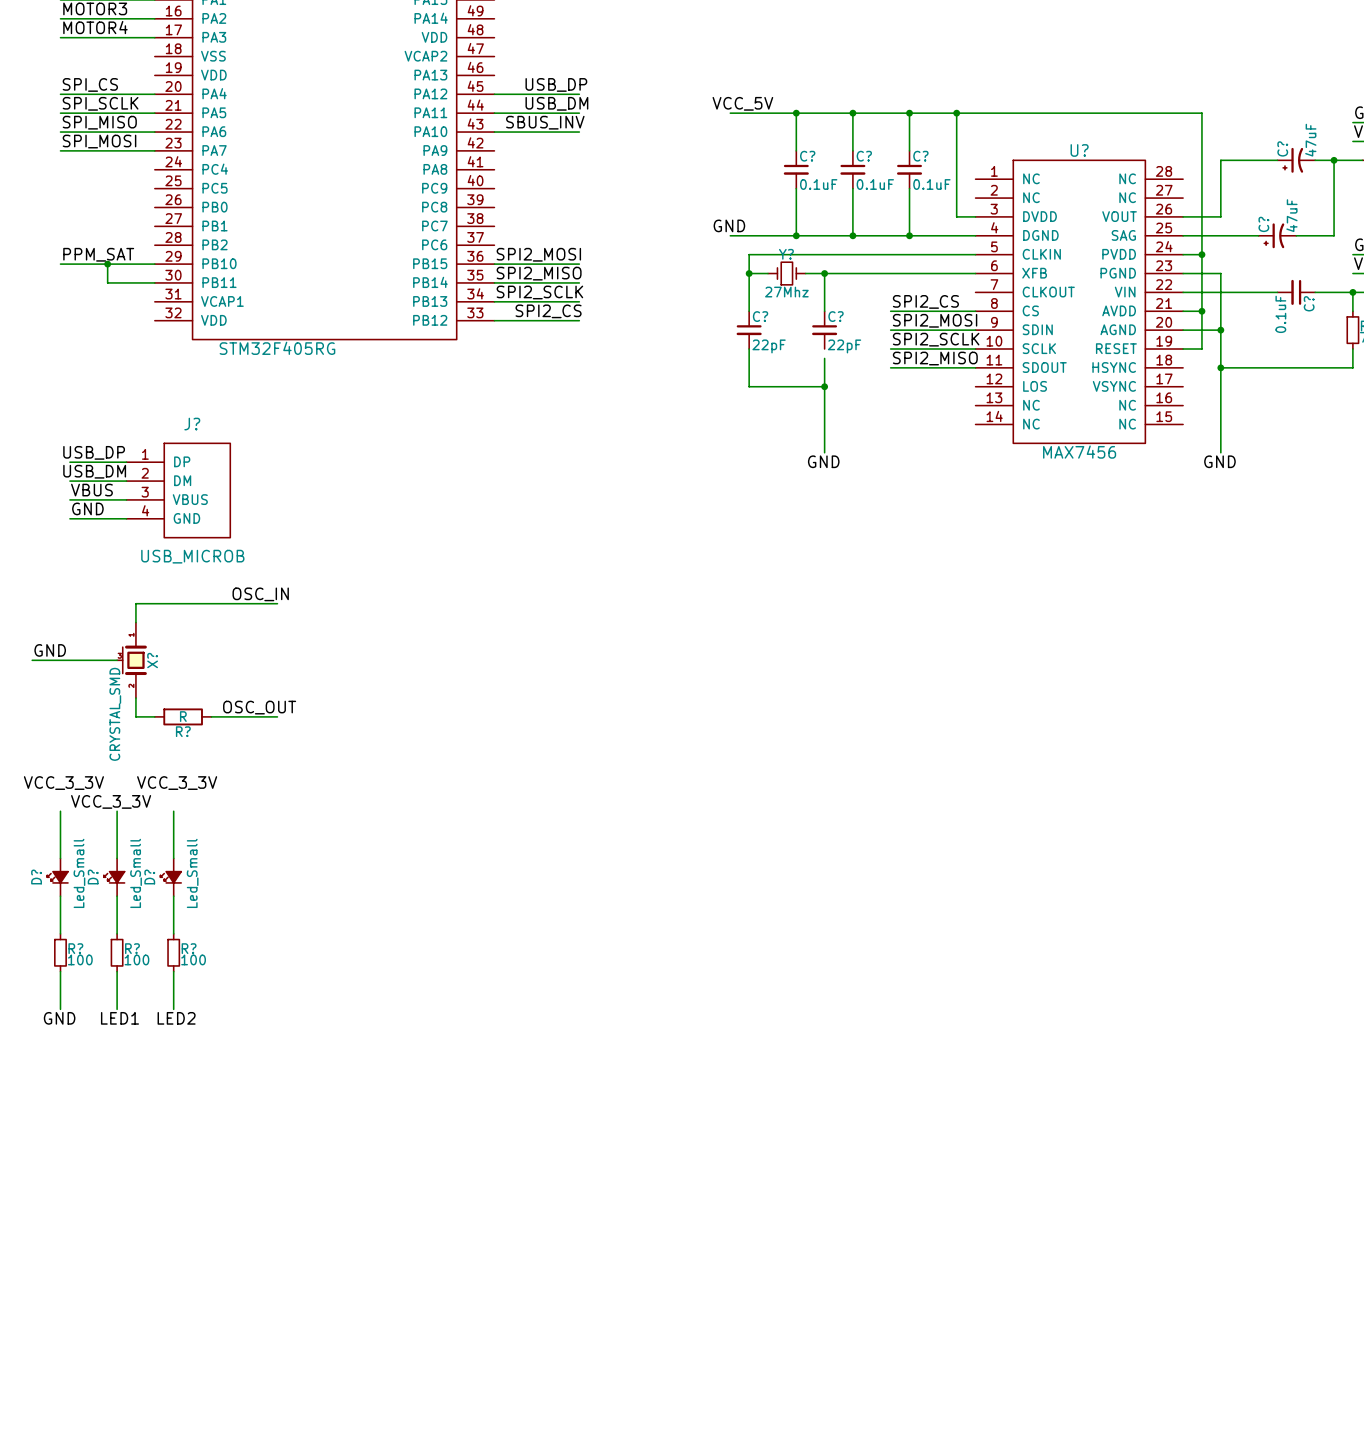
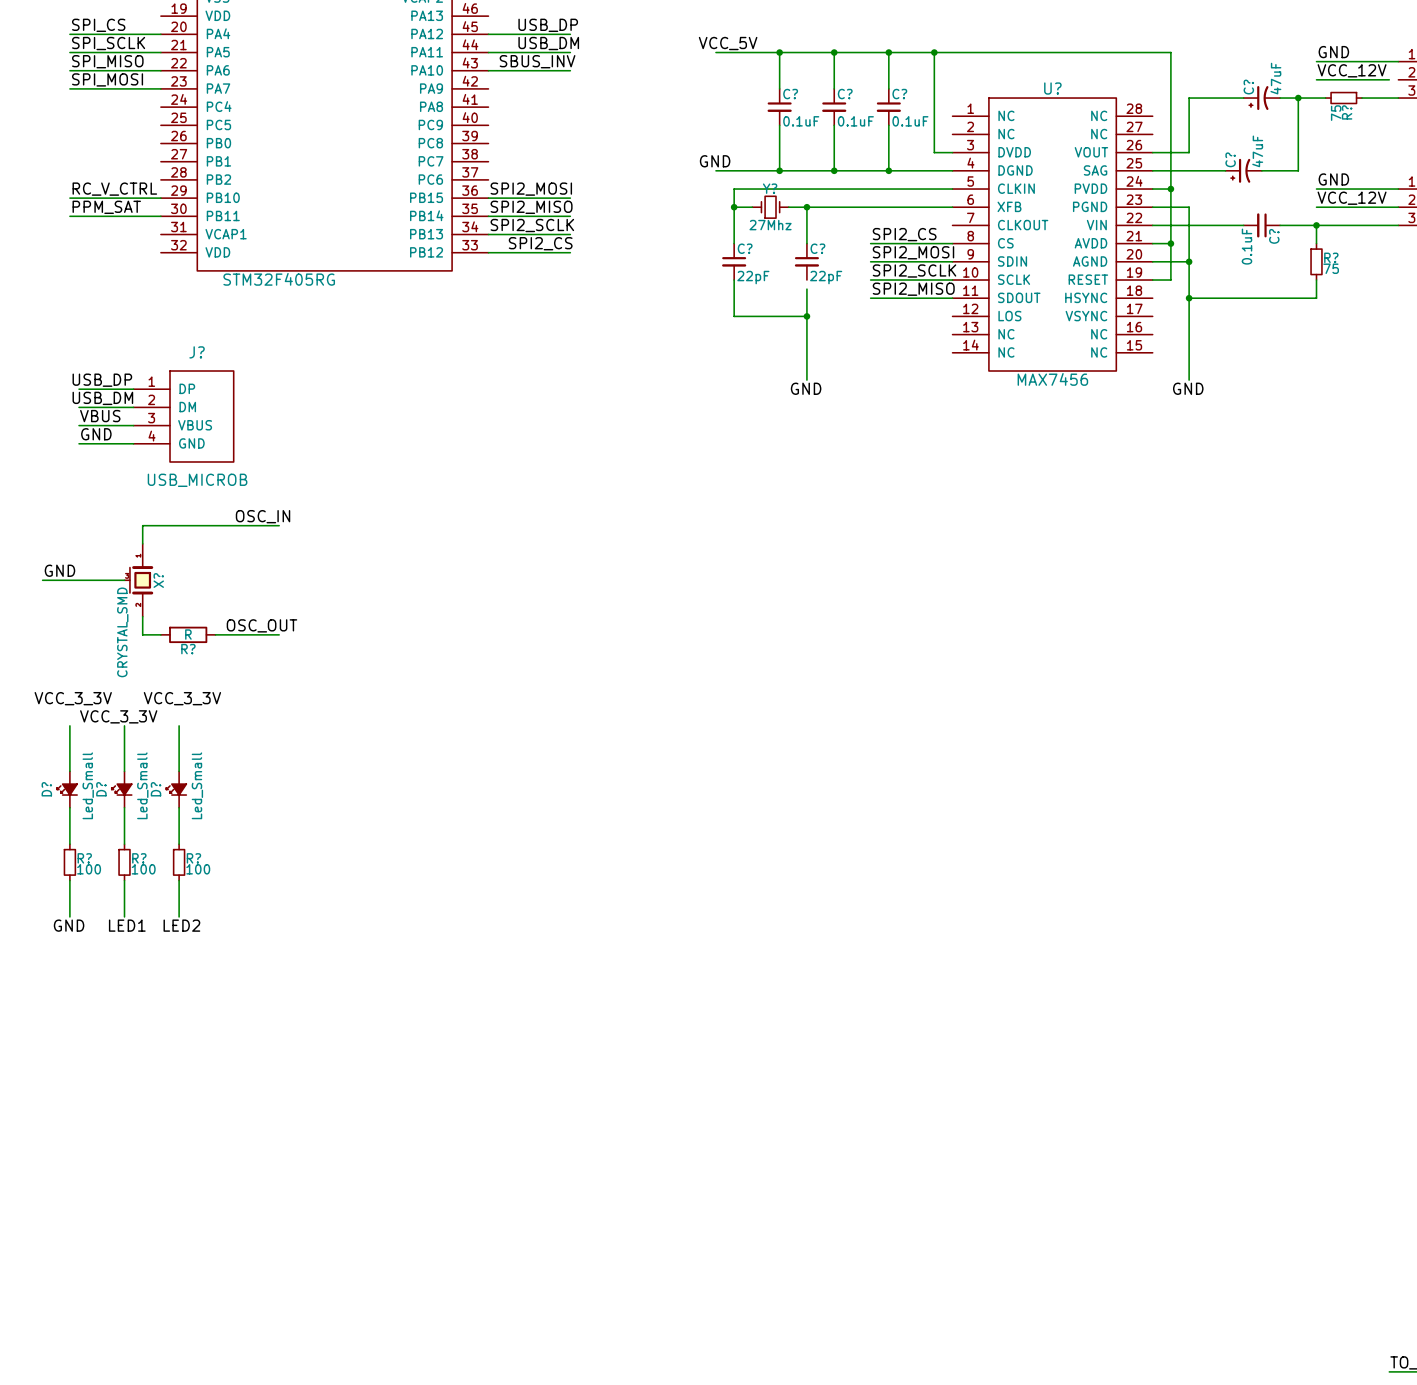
label: PPM_SAT (98, 254) -> RC_V_CTRL (114, 189)
wire: (107, 264) (107, 282) -> (69, 216) (115, 216)
junction: (107, 264) -> none
label: none -> PPM_SAT (106, 207)

